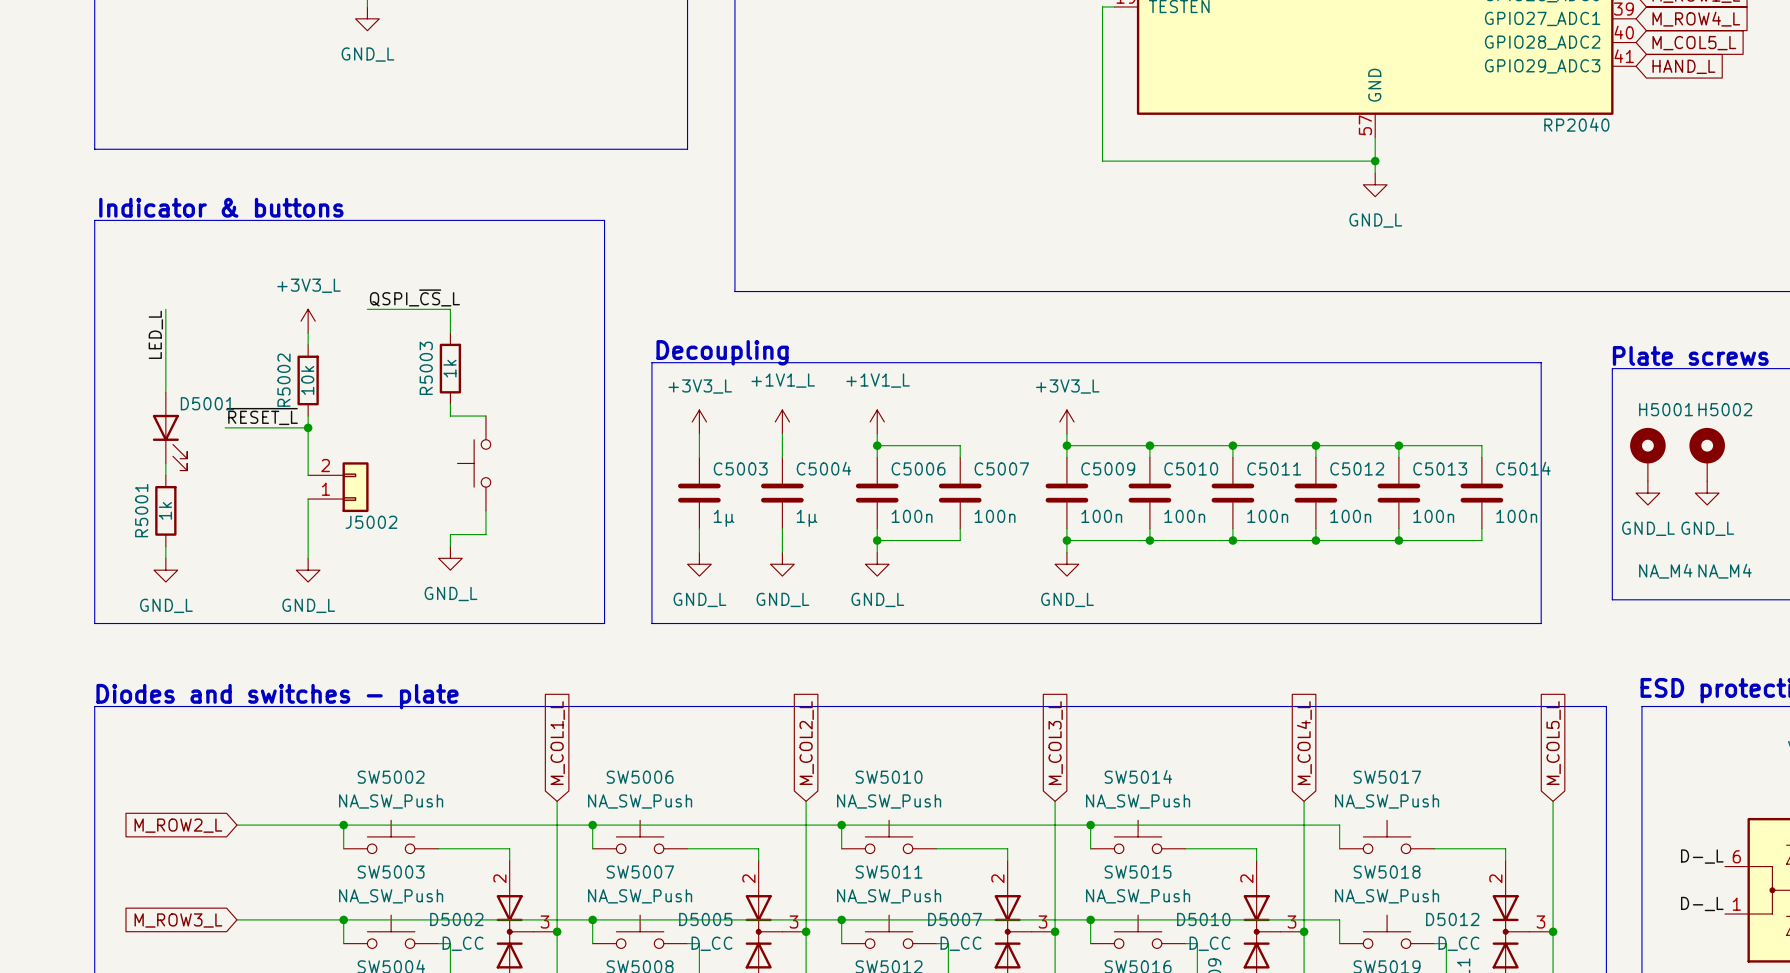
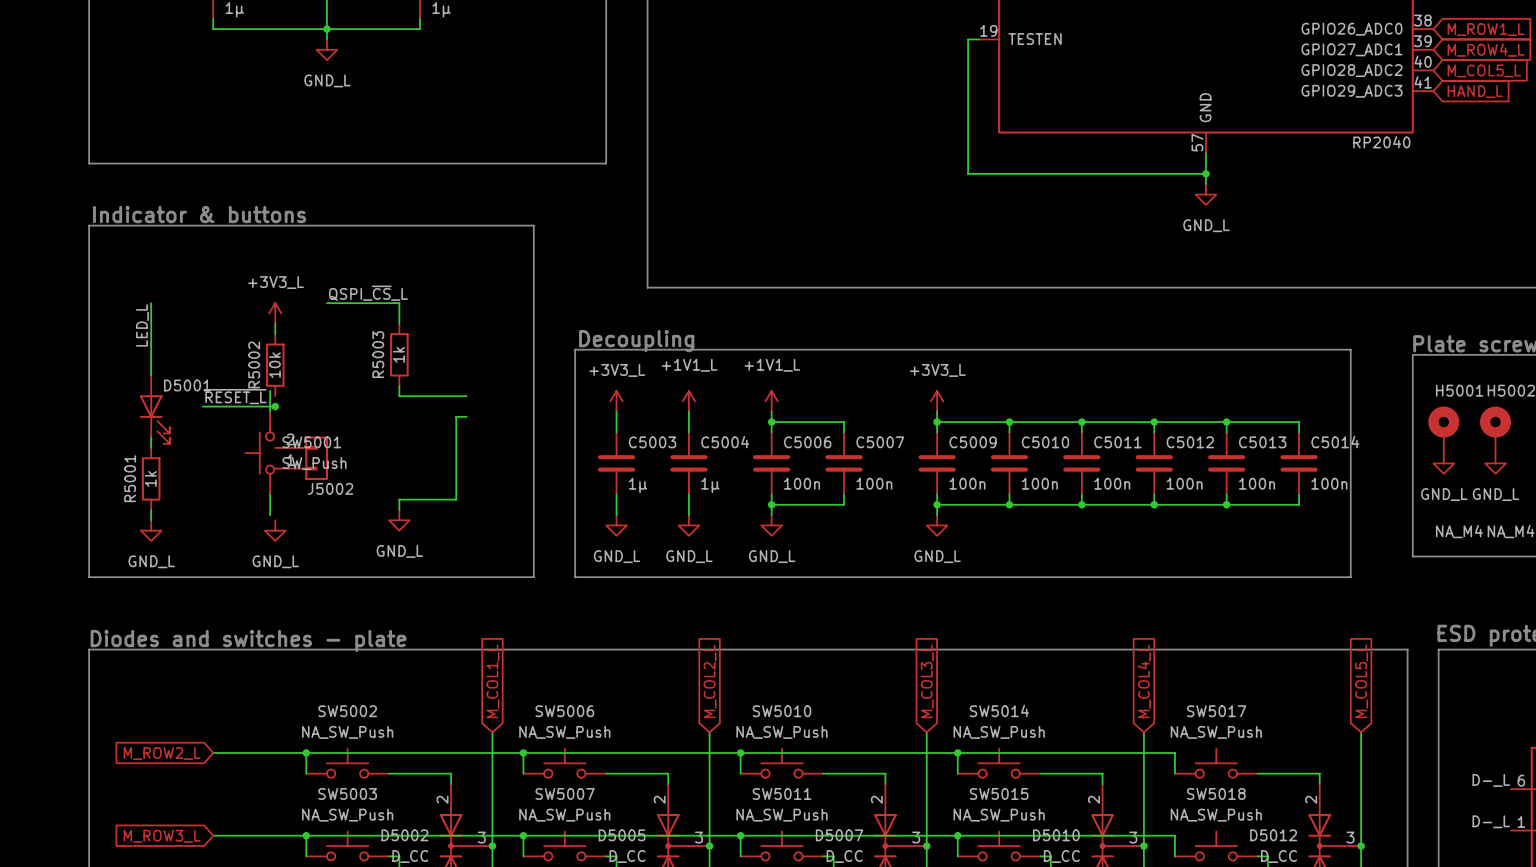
wire: none -> (270, 391) (270, 411)
wire: (308, 416) (308, 475) -> none
wire: none -> (430, 396) (466, 396)
part: (474, 463) -> none
SW5001: none -> SW_Push (259, 453)
wire: (308, 499) (308, 558) -> none
wire: (485, 510) (485, 534) -> (466, 416) (456, 416) (456, 499) (430, 499)
wire: none -> (270, 494) (270, 515)

